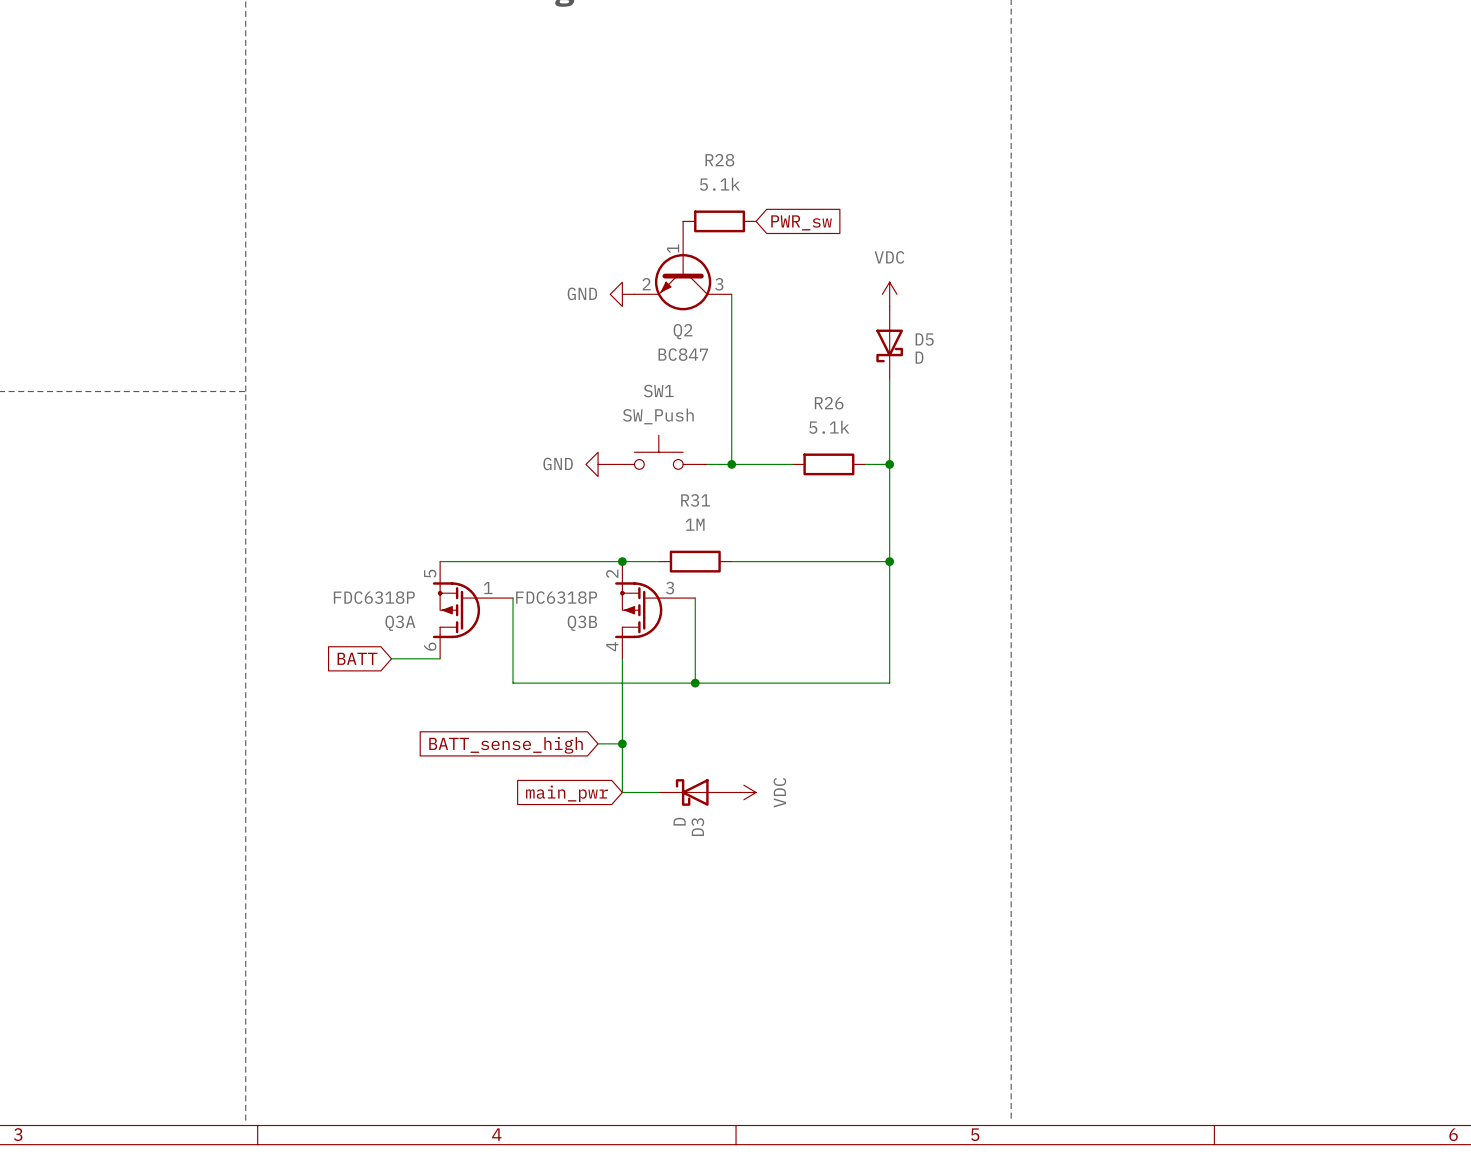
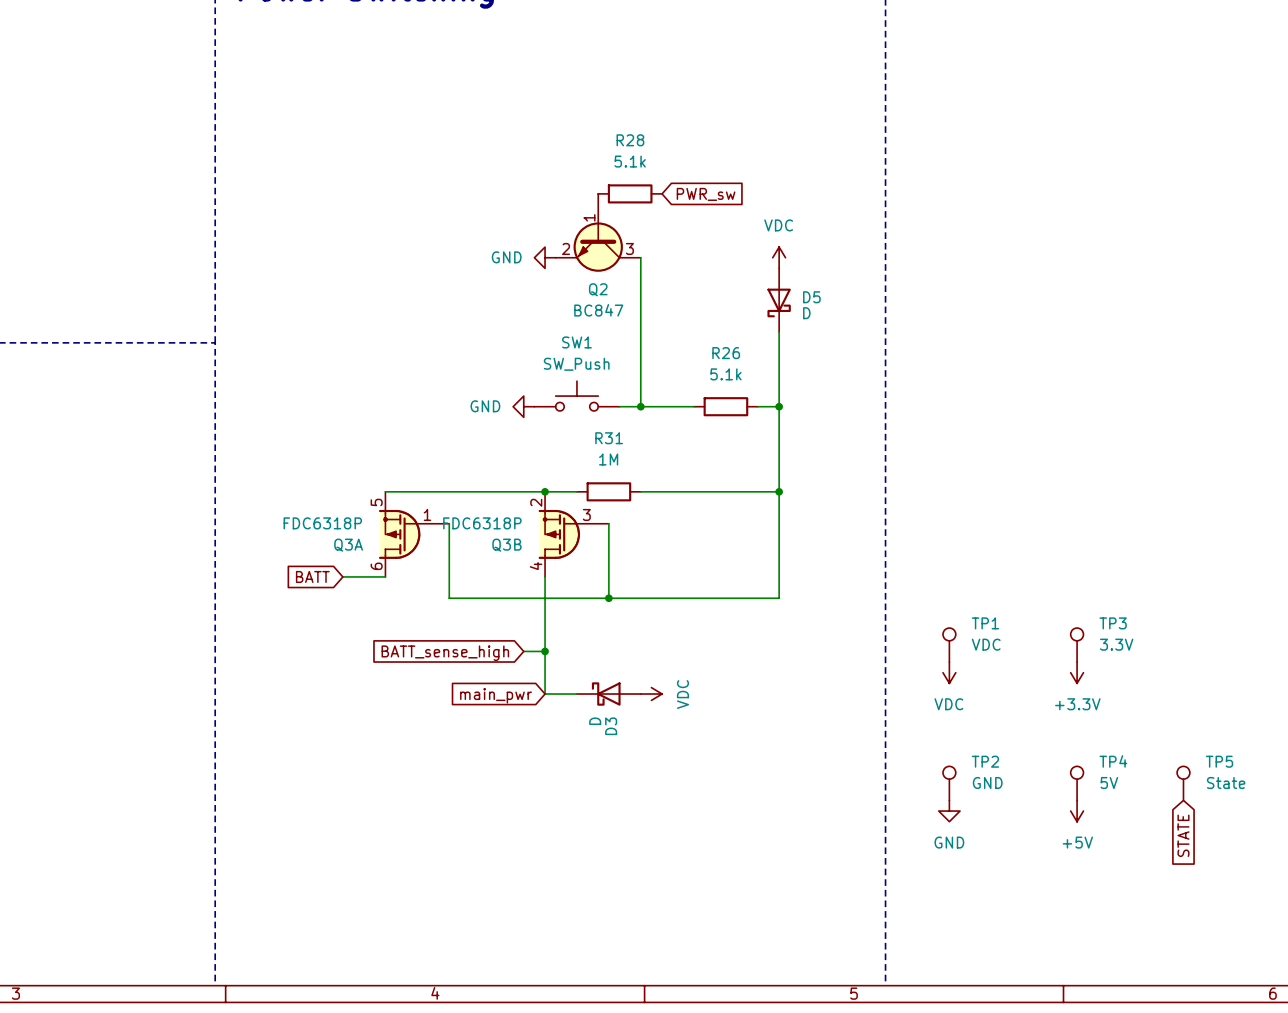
TP1: none -> VDC (949, 645)
TP3: none -> 3.3V (1077, 645)
power symbol: none -> VDC (949, 672)
power symbol: none -> +3.3V (1077, 672)
TP2: none -> GND (949, 783)
TP4: none -> 5V (1077, 783)
TP5: none -> State (1183, 783)
power symbol: none -> GND (949, 811)
power symbol: none -> +5V (1077, 811)
global label: none -> STATE (1183, 835)

